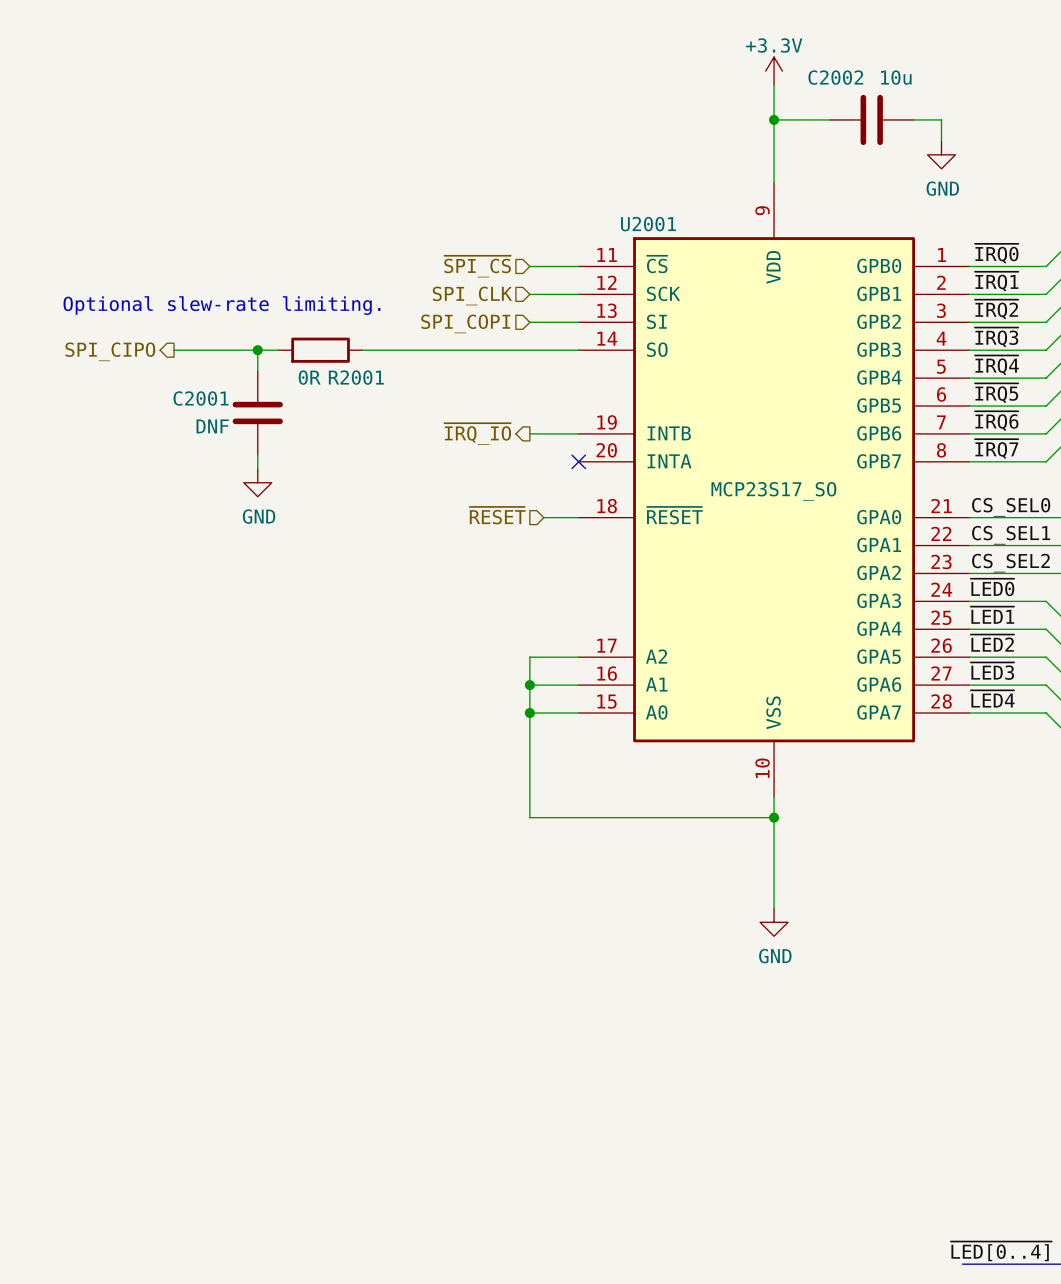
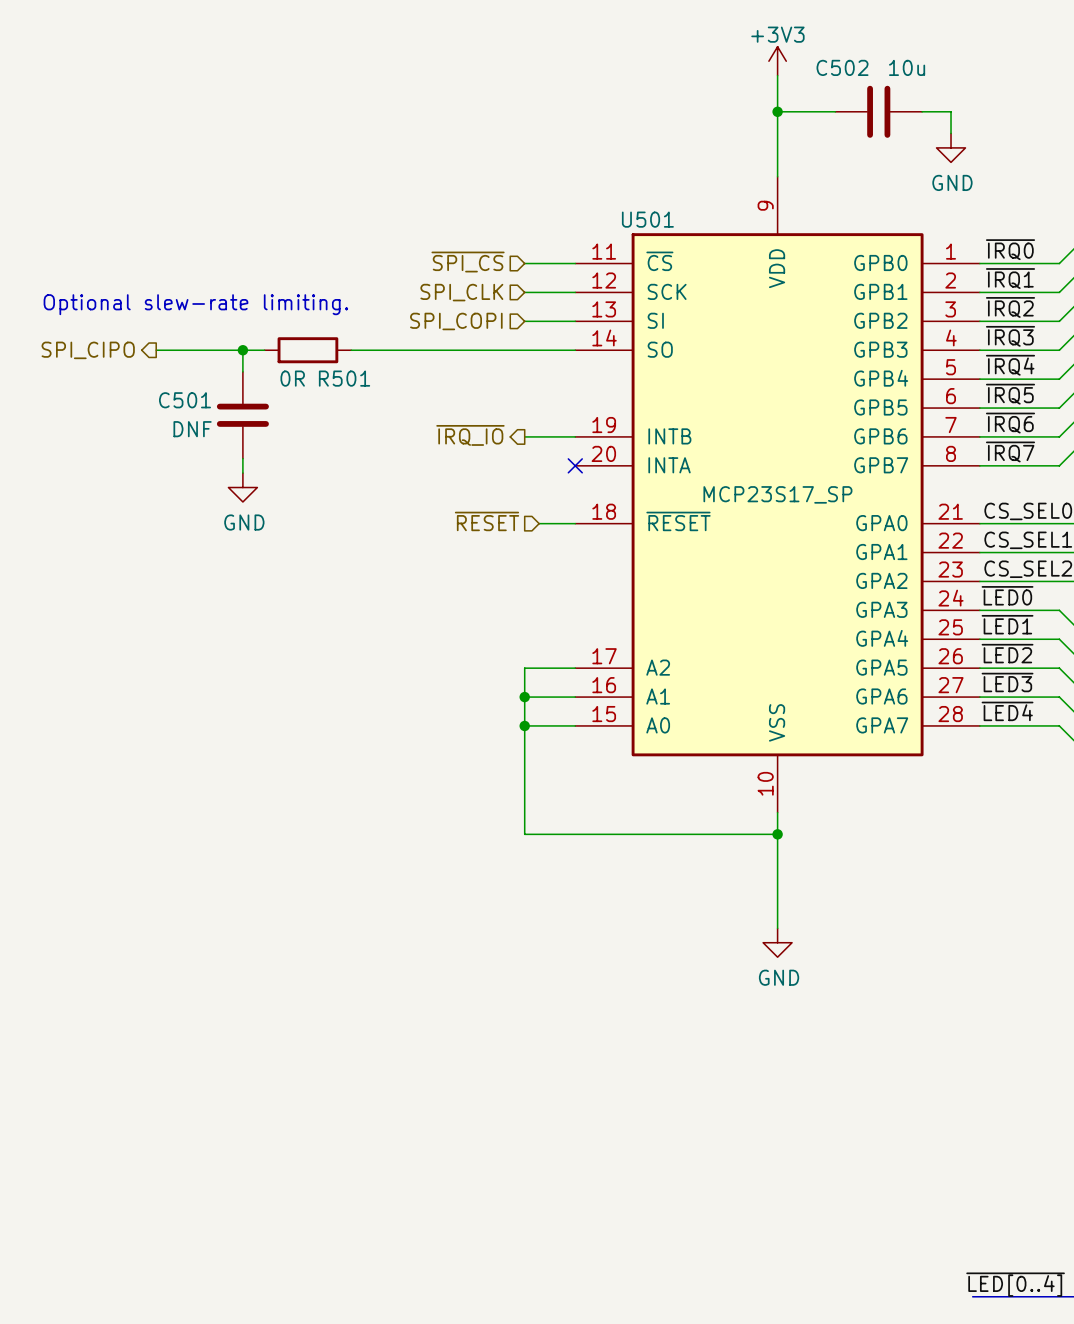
power symbol: +3.3V (774, 71) -> +3V3 (777, 61)
C2002 name: C2002 (835, 77) -> C502 (842, 67)
U2001 name: U2001 (648, 224) -> U501 (647, 219)
R2001 name: R2001 (356, 377) -> R501 (344, 378)
C2001 name: C2001 (201, 398) -> C501 (184, 400)
U2001 value: MCP23S17_SO (773, 491) -> MCP23S17_SP (777, 494)

